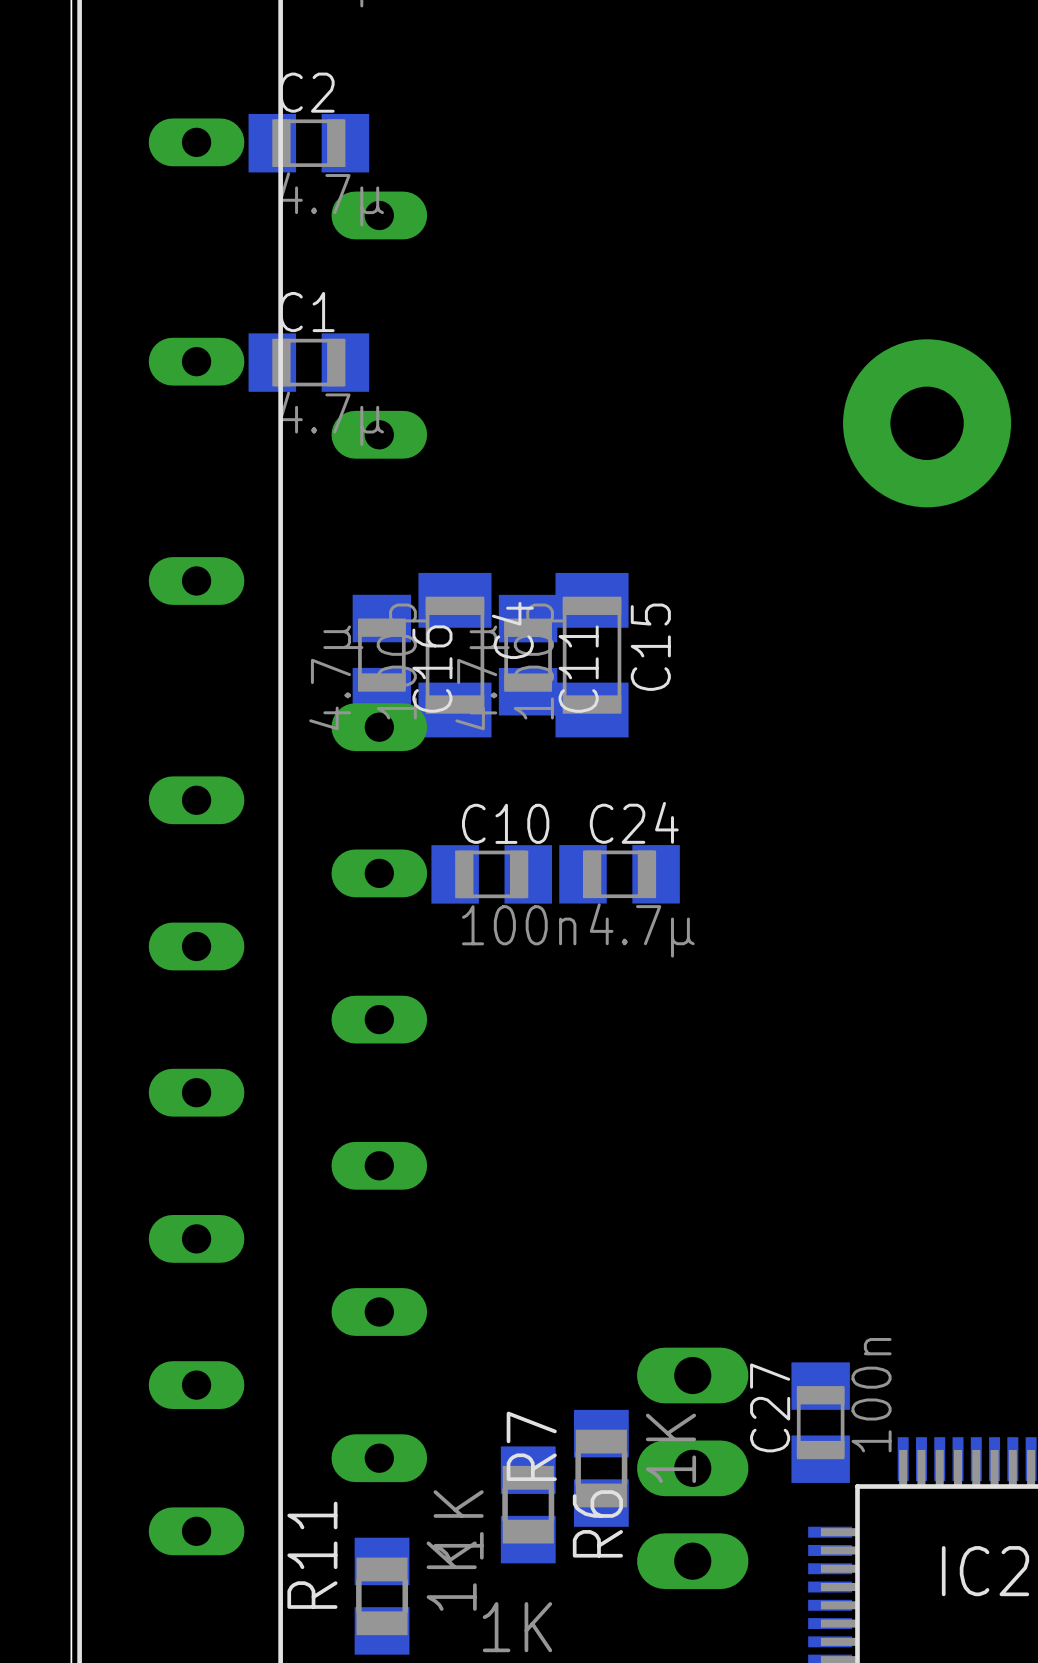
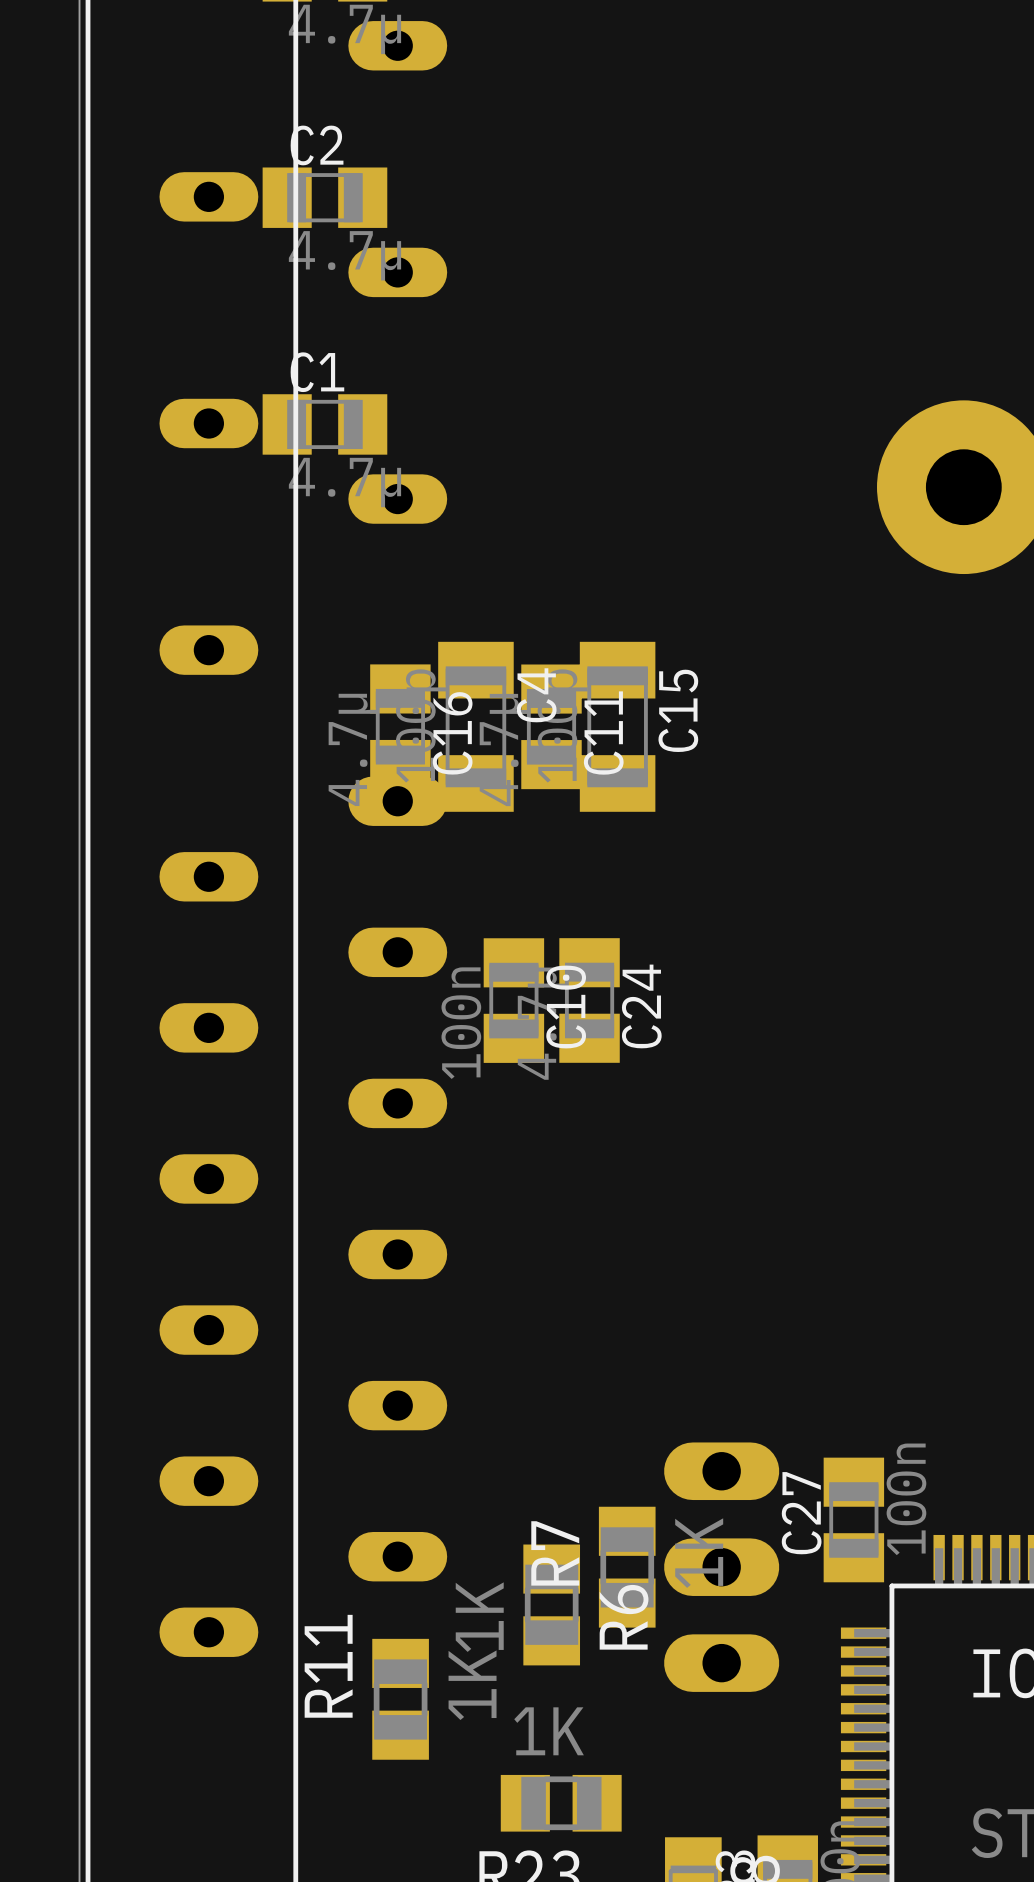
C10 rotation: 0° (491, 874) -> 90° clockwise (513, 1000)
C24 rotation: 0° (619, 874) -> 90° clockwise (589, 1000)

